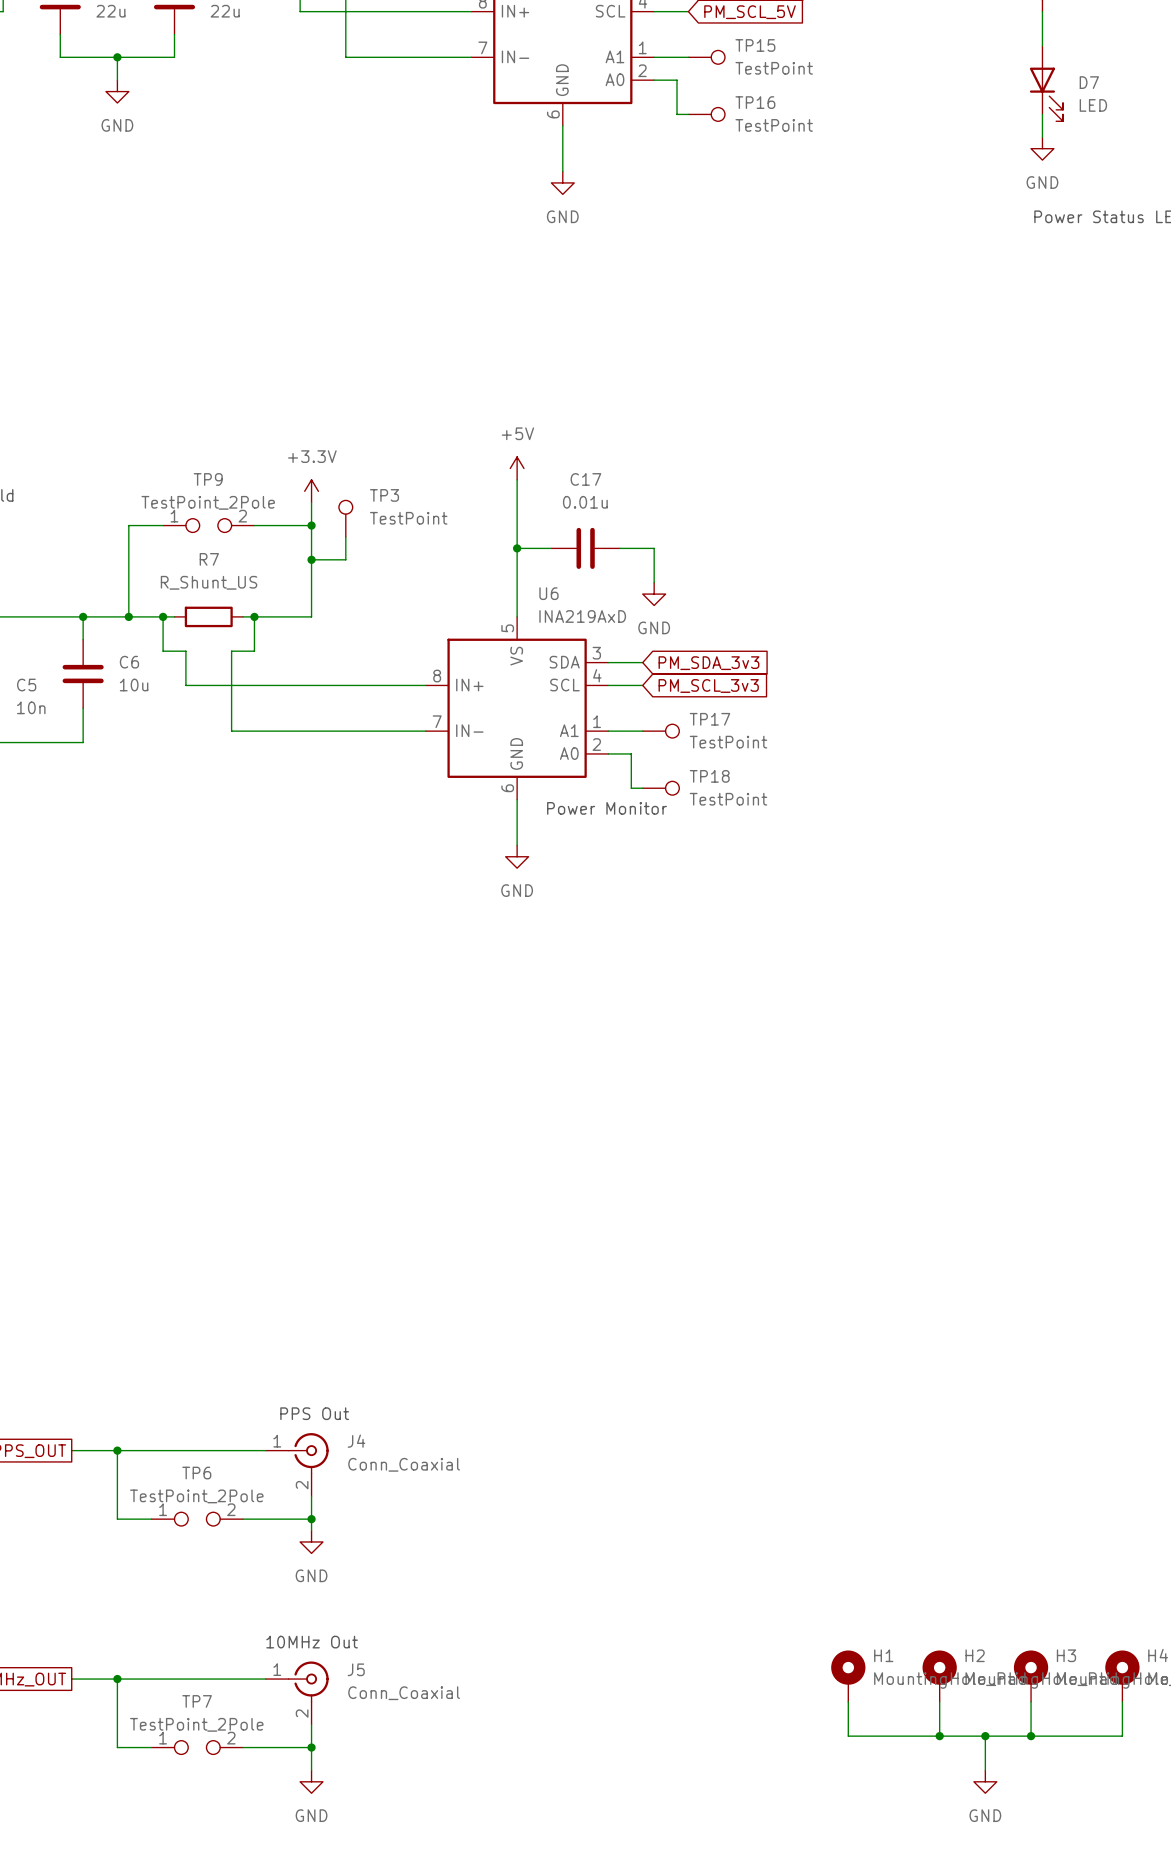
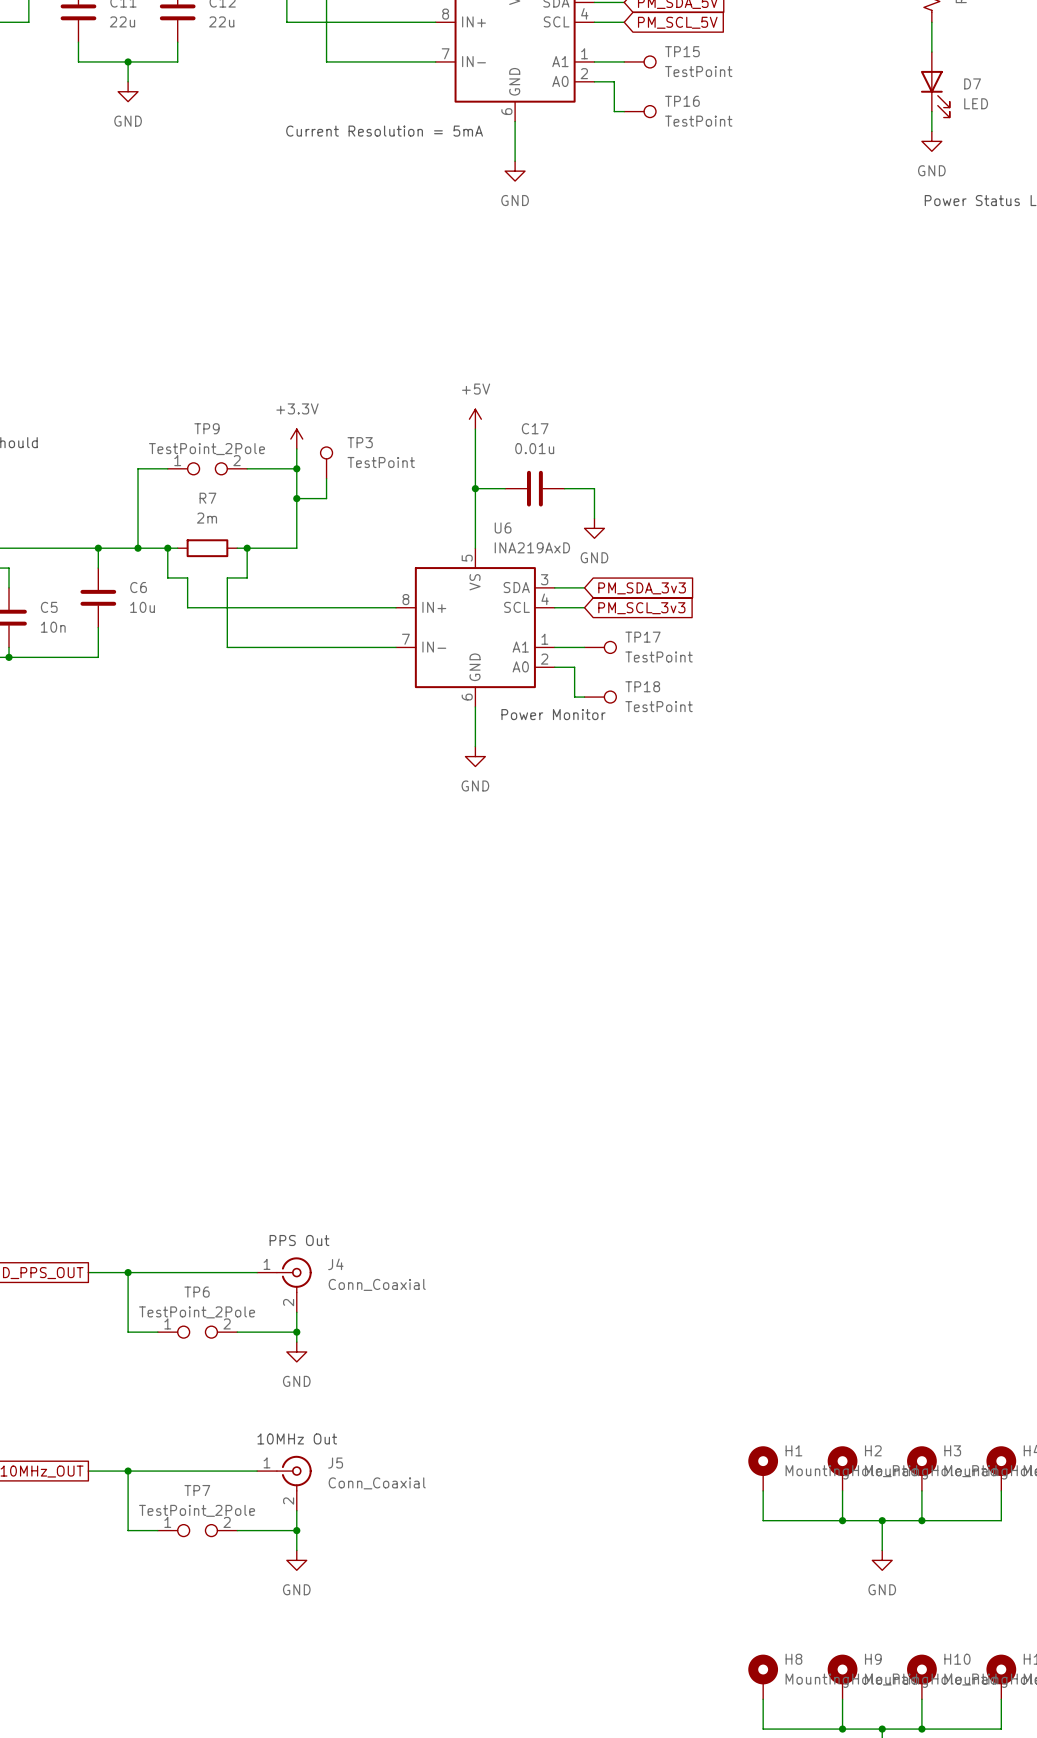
text: none -> Current Resolution = 5mA (384, 131)
R7 value: R_Shunt_US (209, 582) -> 2m (207, 518)

